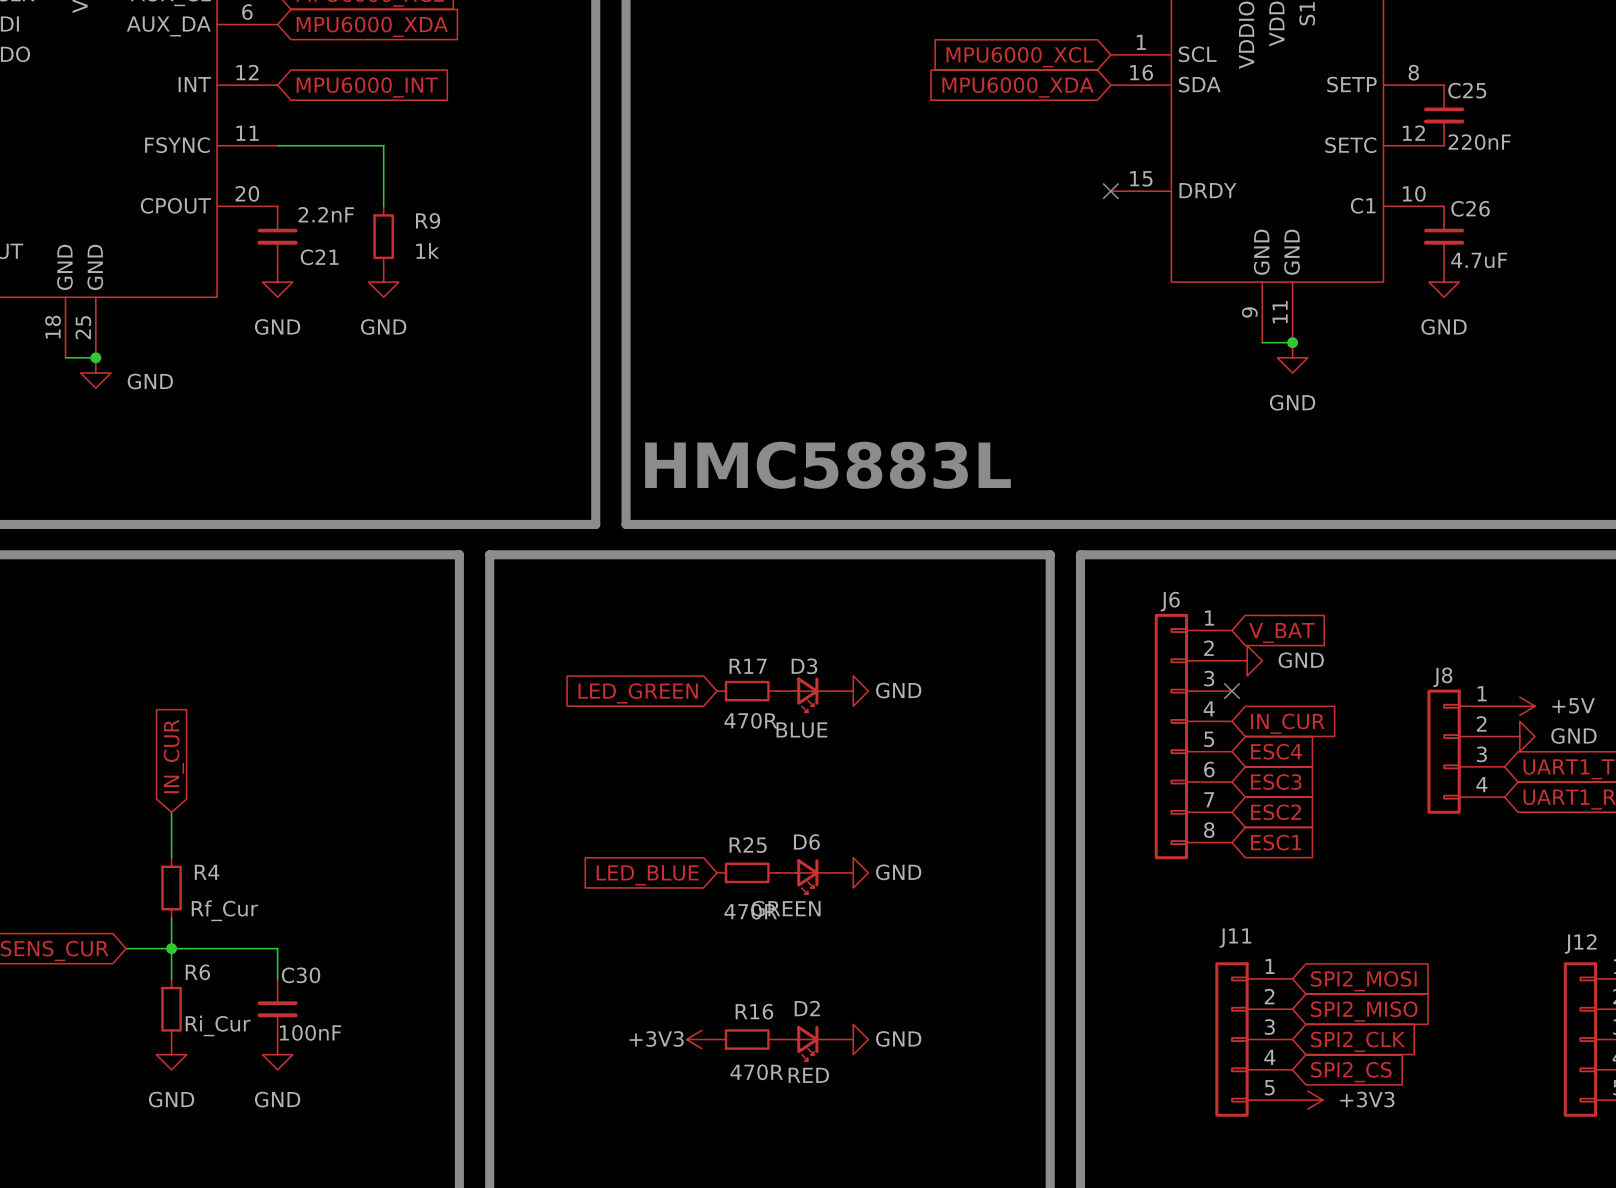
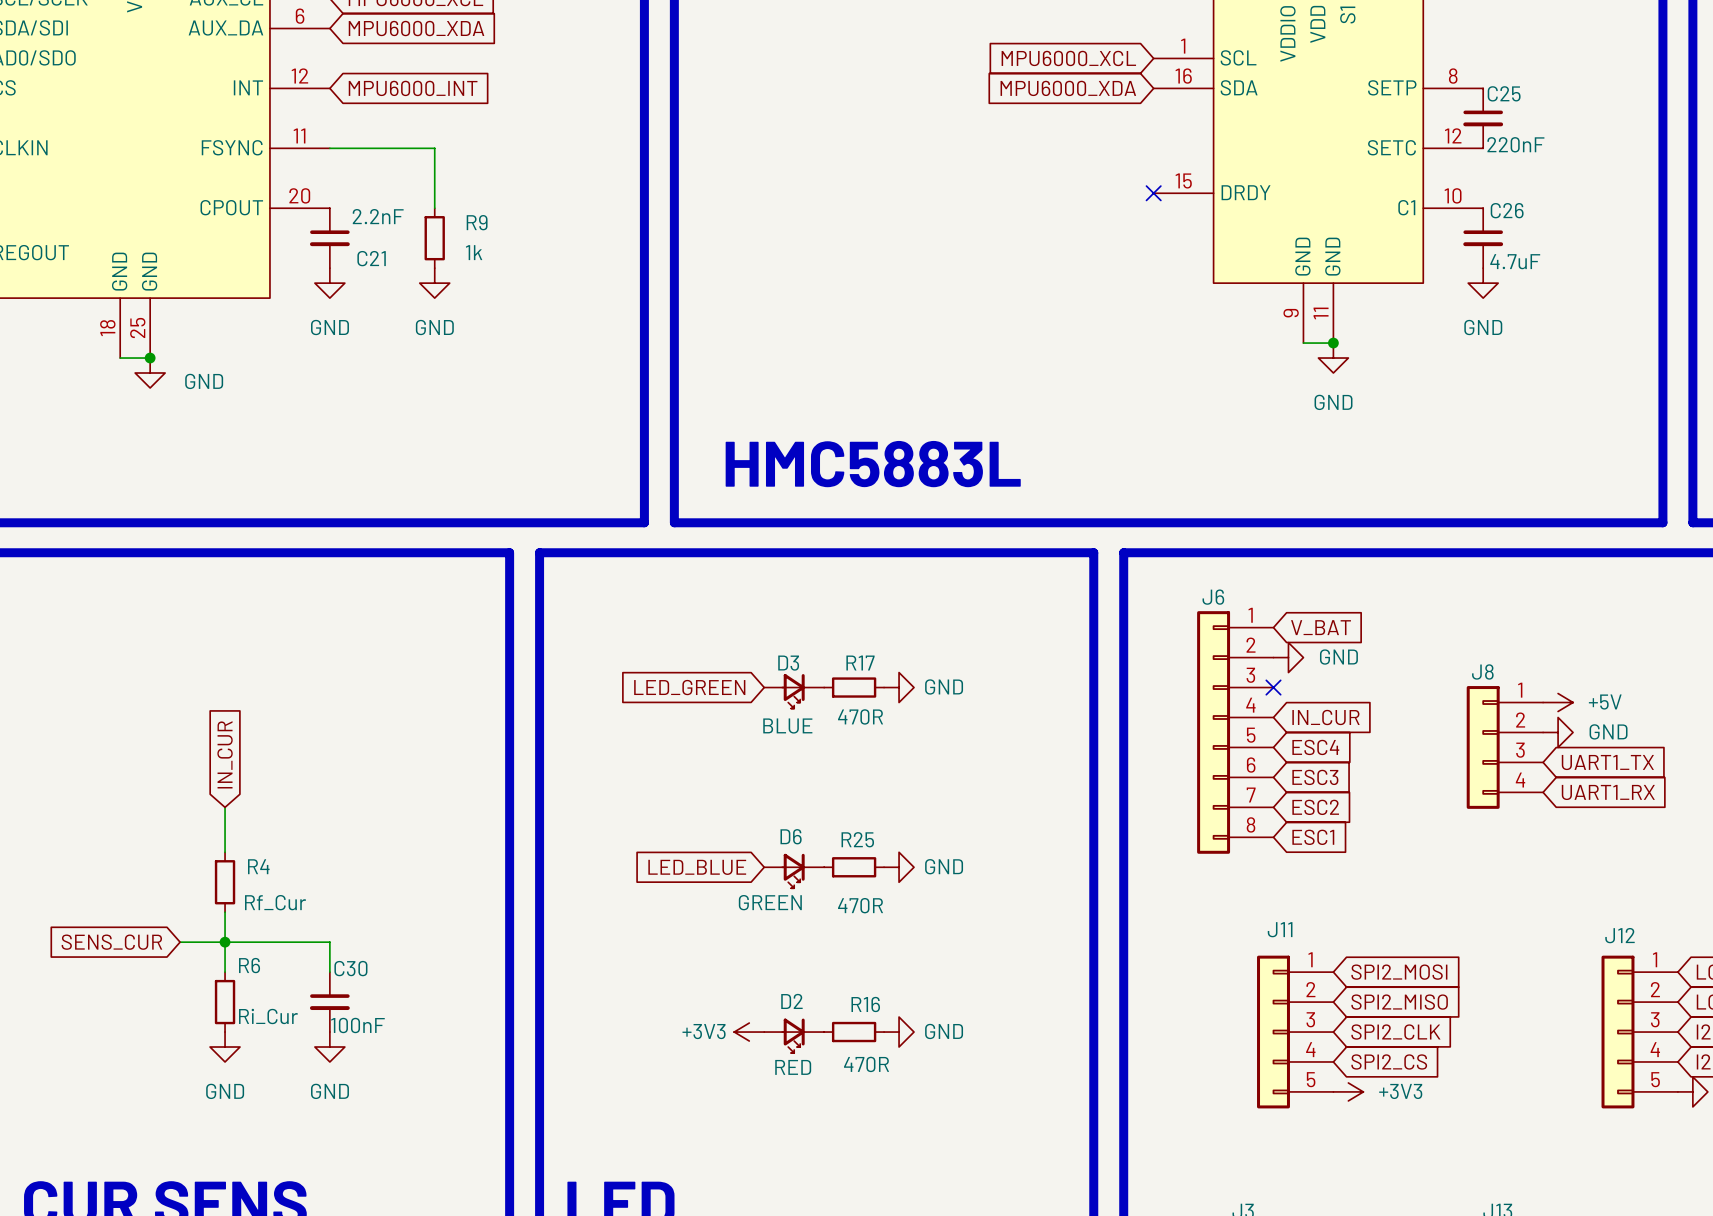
R17 position: (747, 691) -> (854, 687)
D3 position: (807, 694) -> (794, 691)
R25 position: (747, 872) -> (854, 867)
D6 position: (807, 876) -> (794, 871)
R16 position: (747, 1039) -> (854, 1032)
D2 position: (807, 1043) -> (794, 1035)

